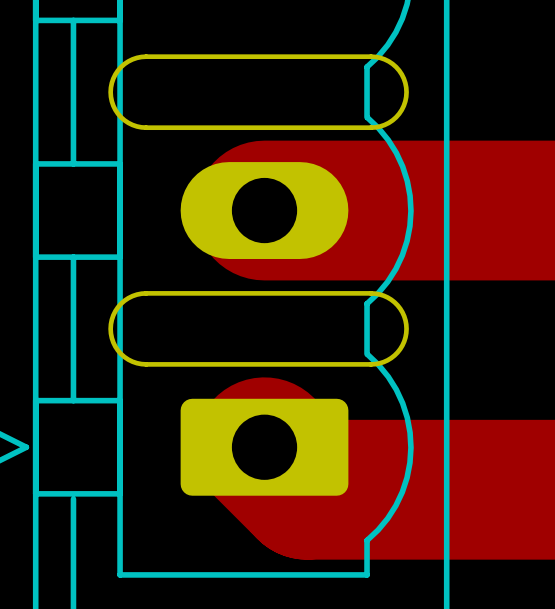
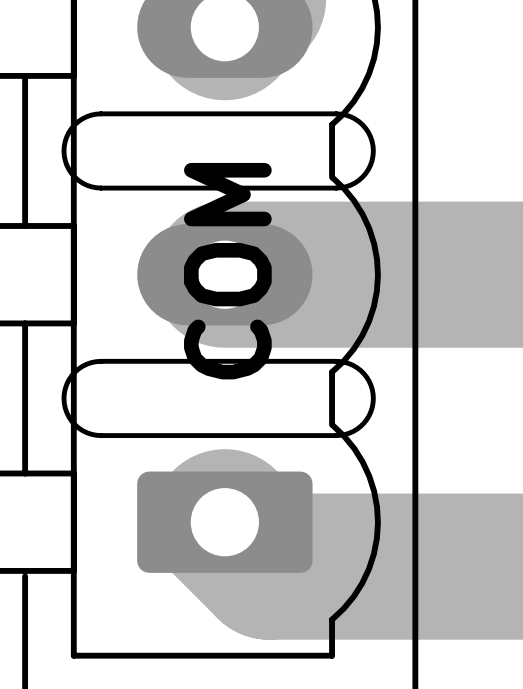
text: none -> COM (227, 271)

